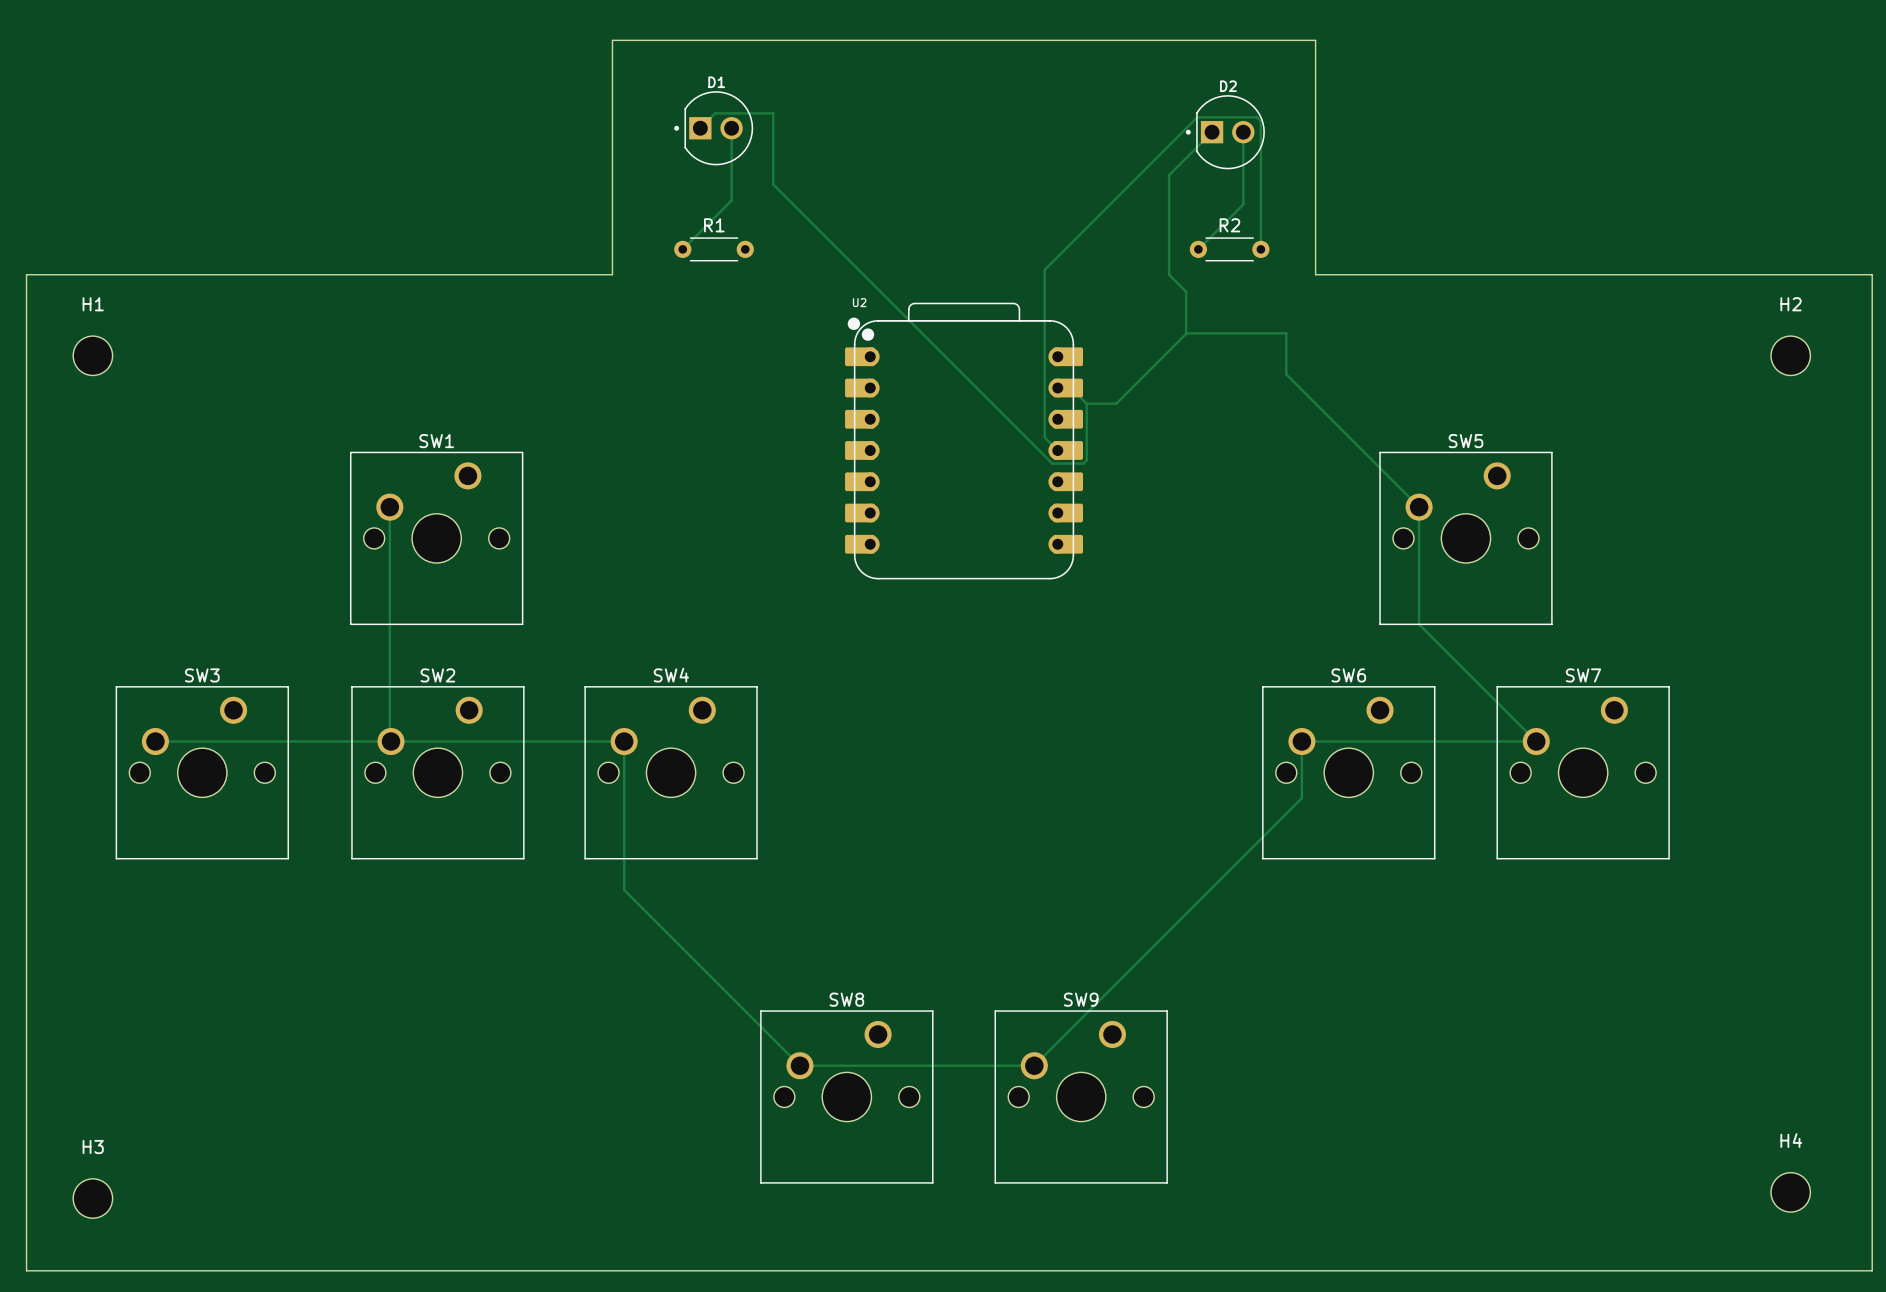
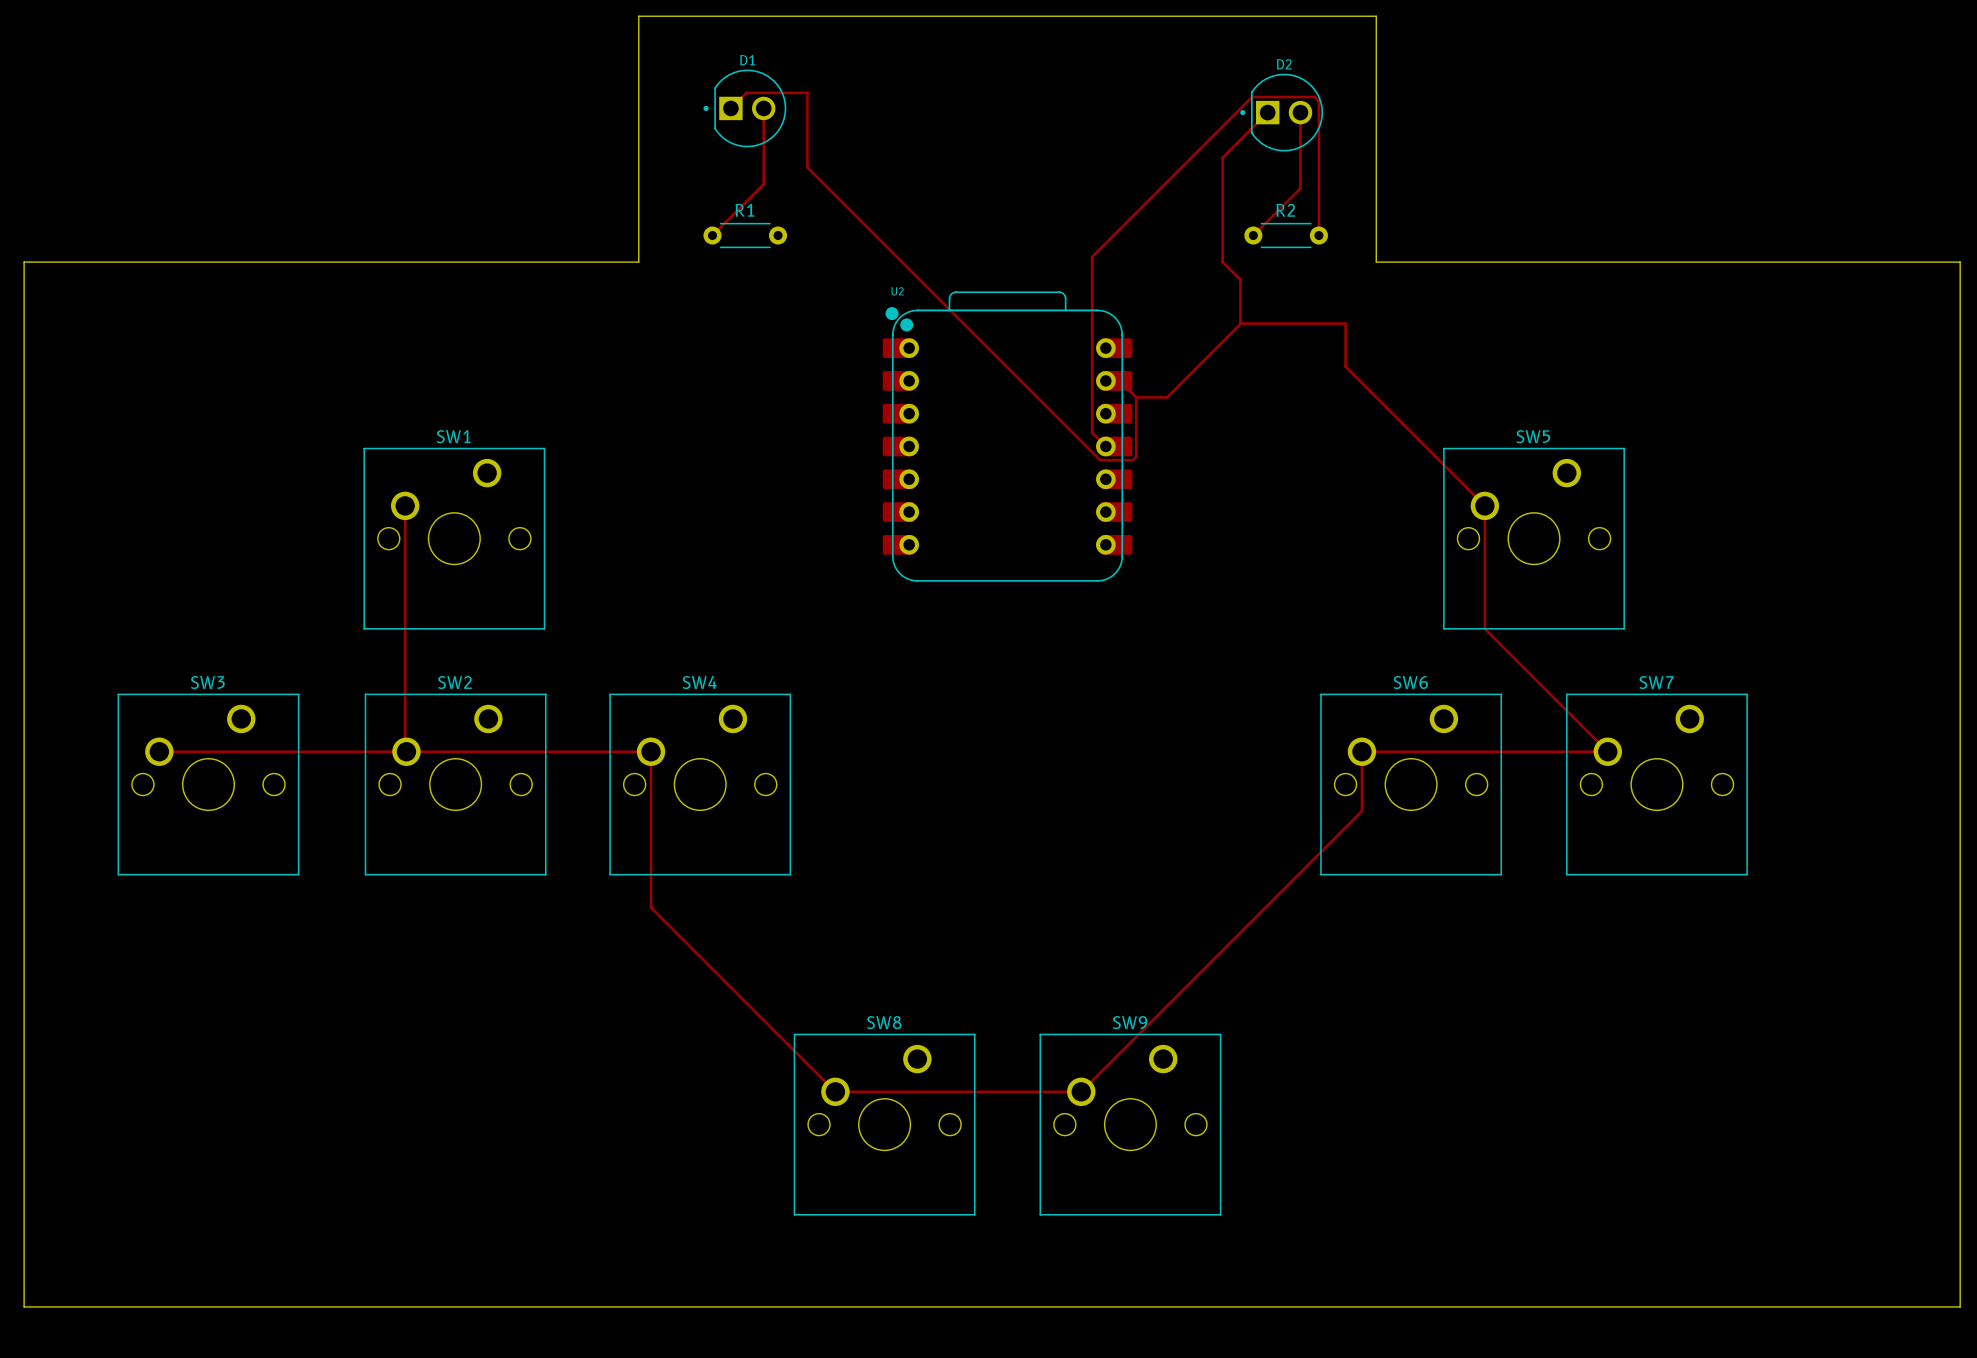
H1: (92, 355) -> none
H2: (1790, 355) -> none
H4: (1790, 1192) -> none
H3: (92, 1198) -> none

